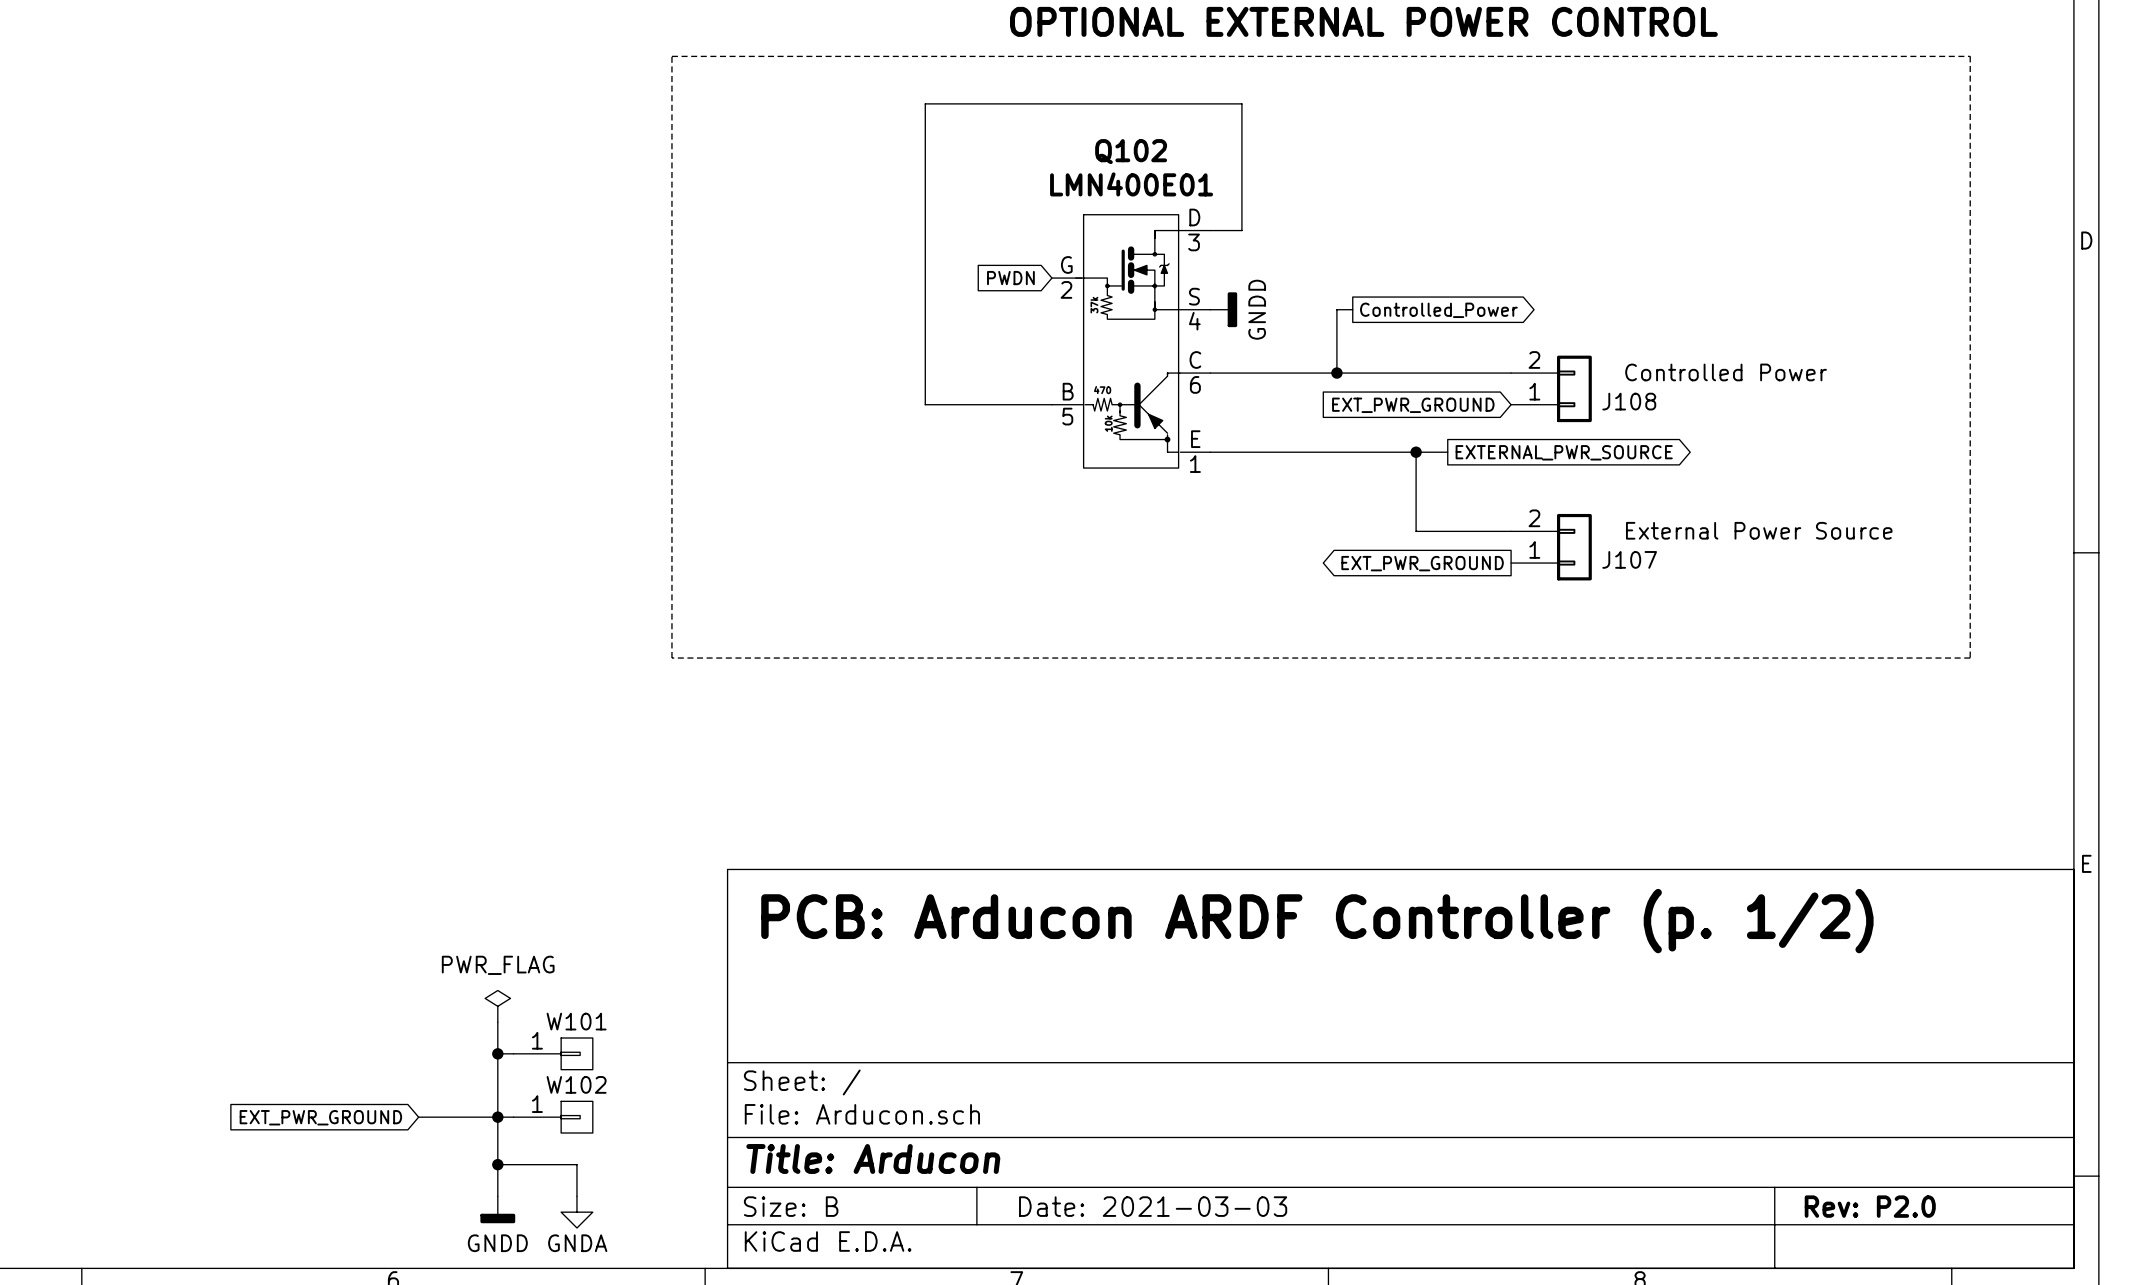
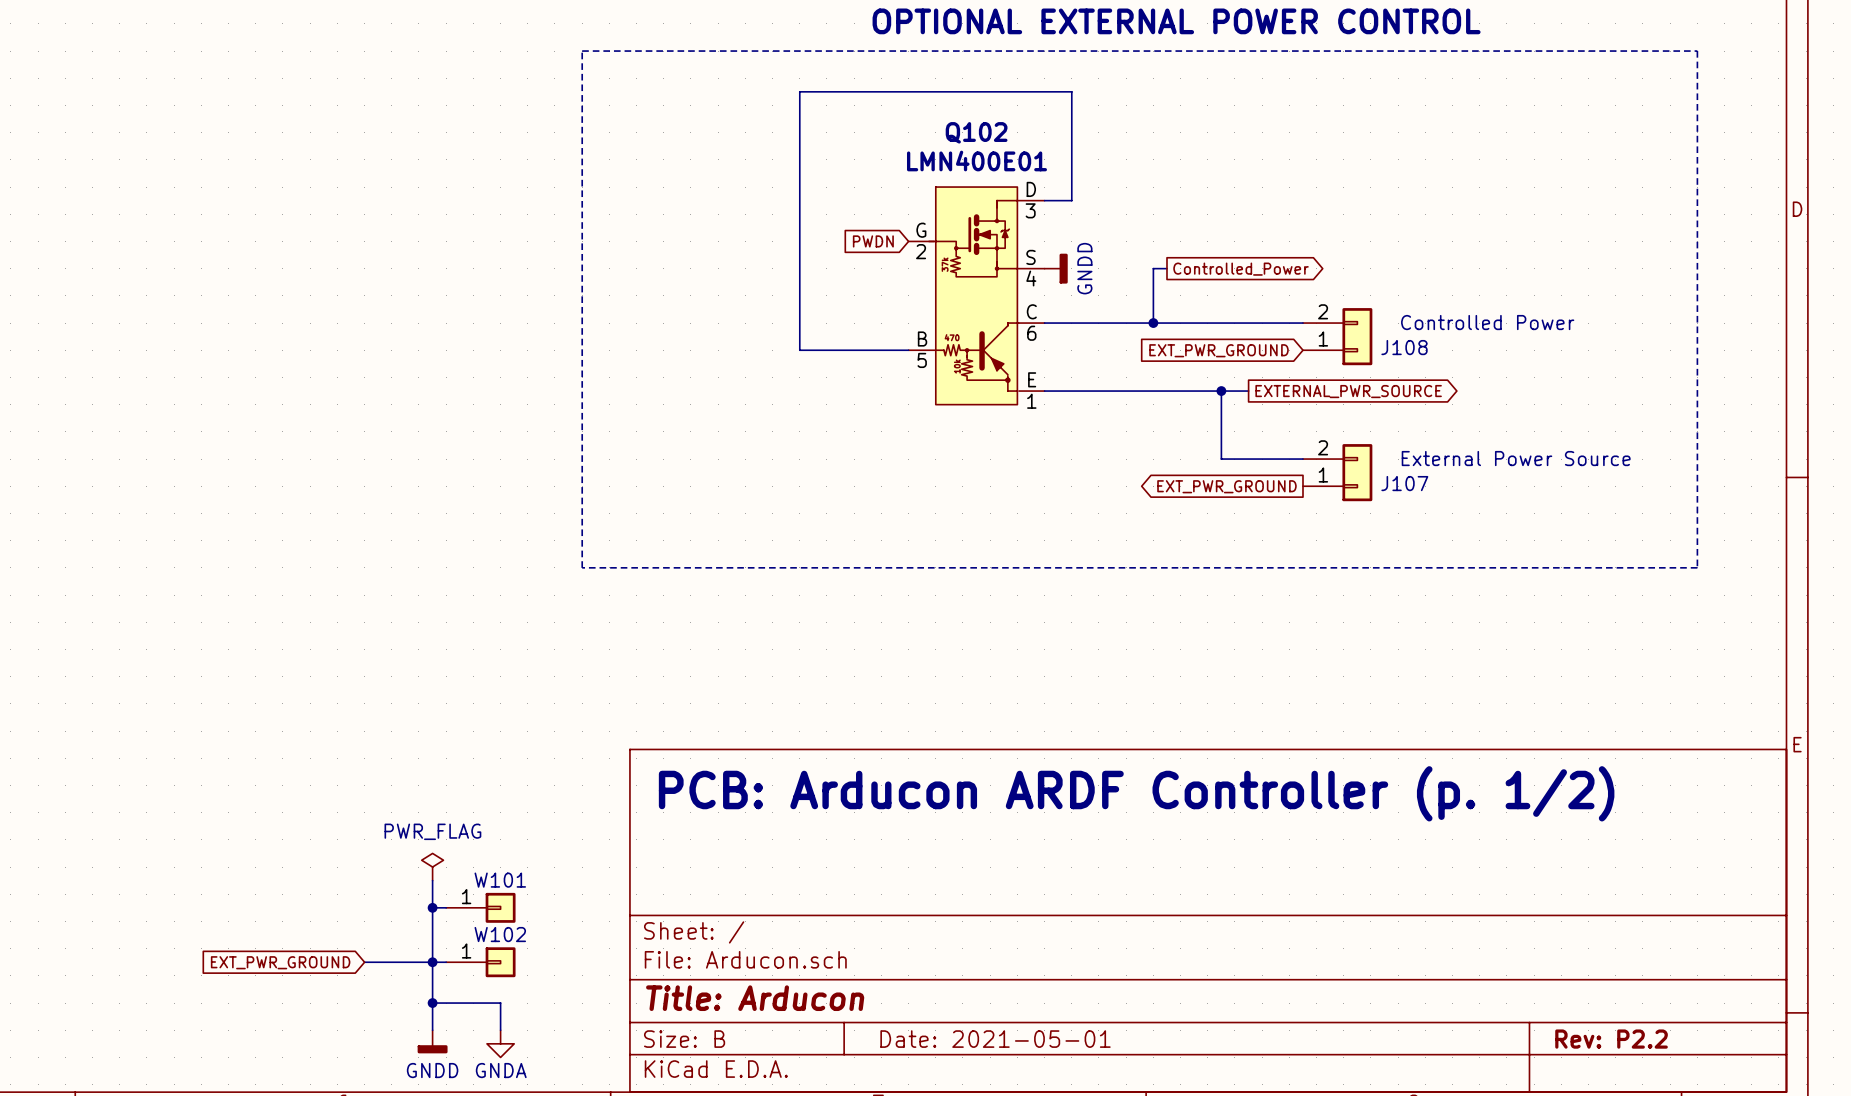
W101 symbol: [513, 1038, 593, 1070] -> [446, 892, 516, 923]
W102 symbol: [513, 1101, 593, 1133] -> [446, 947, 516, 978]
title block: Date: 2021-03-03 (1153, 1206) -> Date: 2021-05-01 (995, 1039)
title block: Rev: P2.0 (1870, 1206) -> Rev: P2.2 (1611, 1039)

